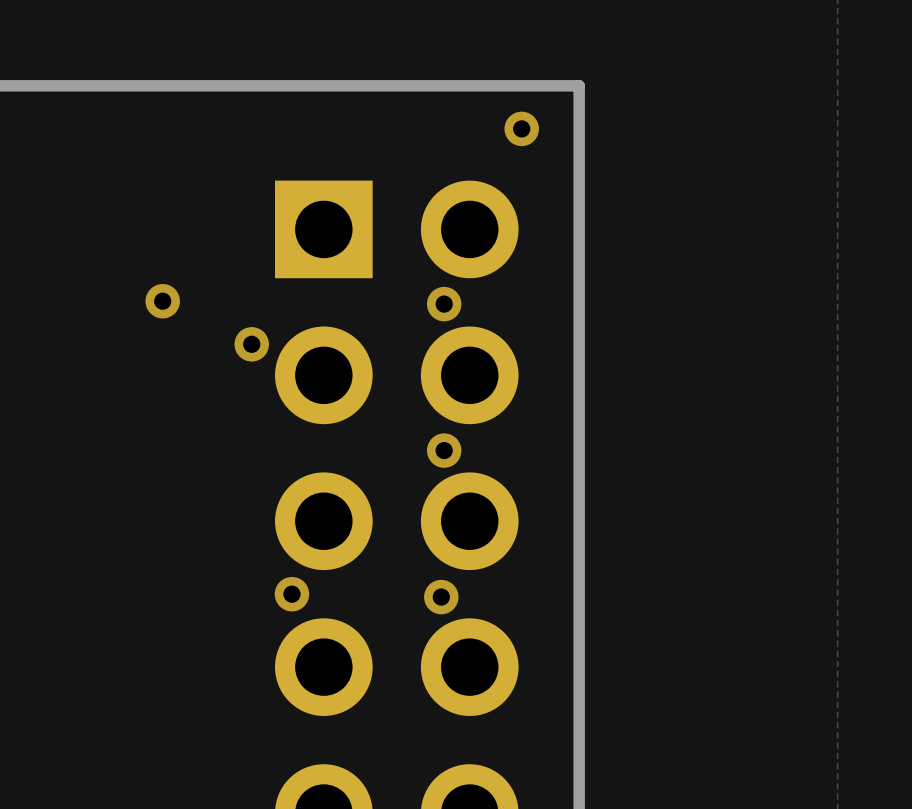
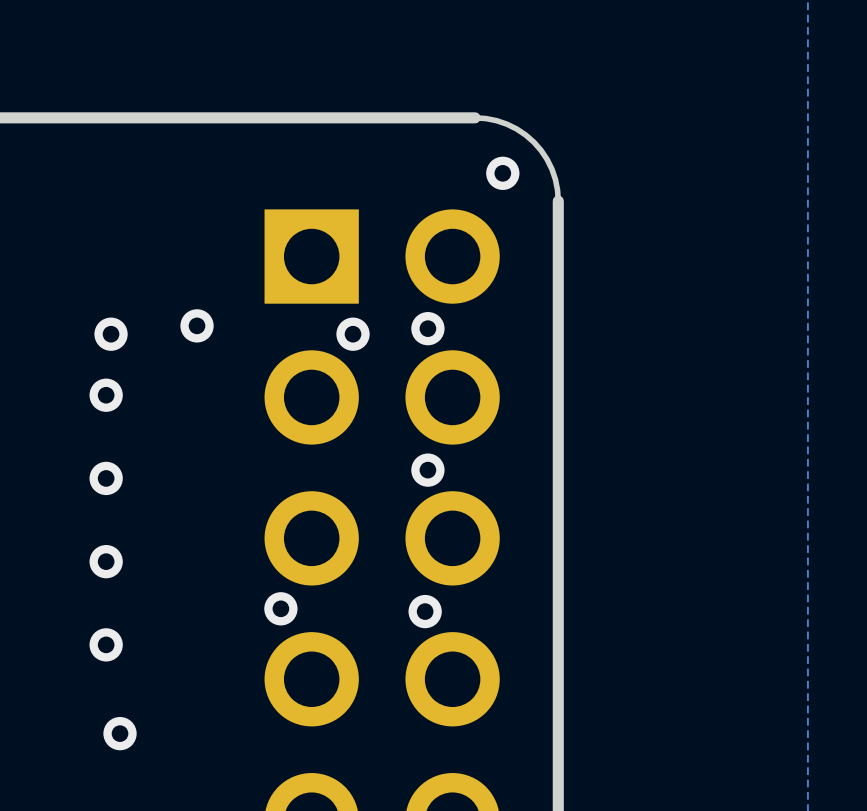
board edge: (493, 85) (579, 85) (579, 171) -> (475, 117) (506, 124) (533, 142) (551, 169) (558, 201)
via position: (521, 128) -> (502, 173)
via: (162, 301) -> none
via: none -> (197, 325)
via: none -> (111, 334)
via: none -> (353, 334)
via: (251, 344) -> none
via: none -> (106, 395)
via: none -> (106, 478)
via: none -> (106, 561)
via: none -> (106, 644)
via: none -> (120, 733)

